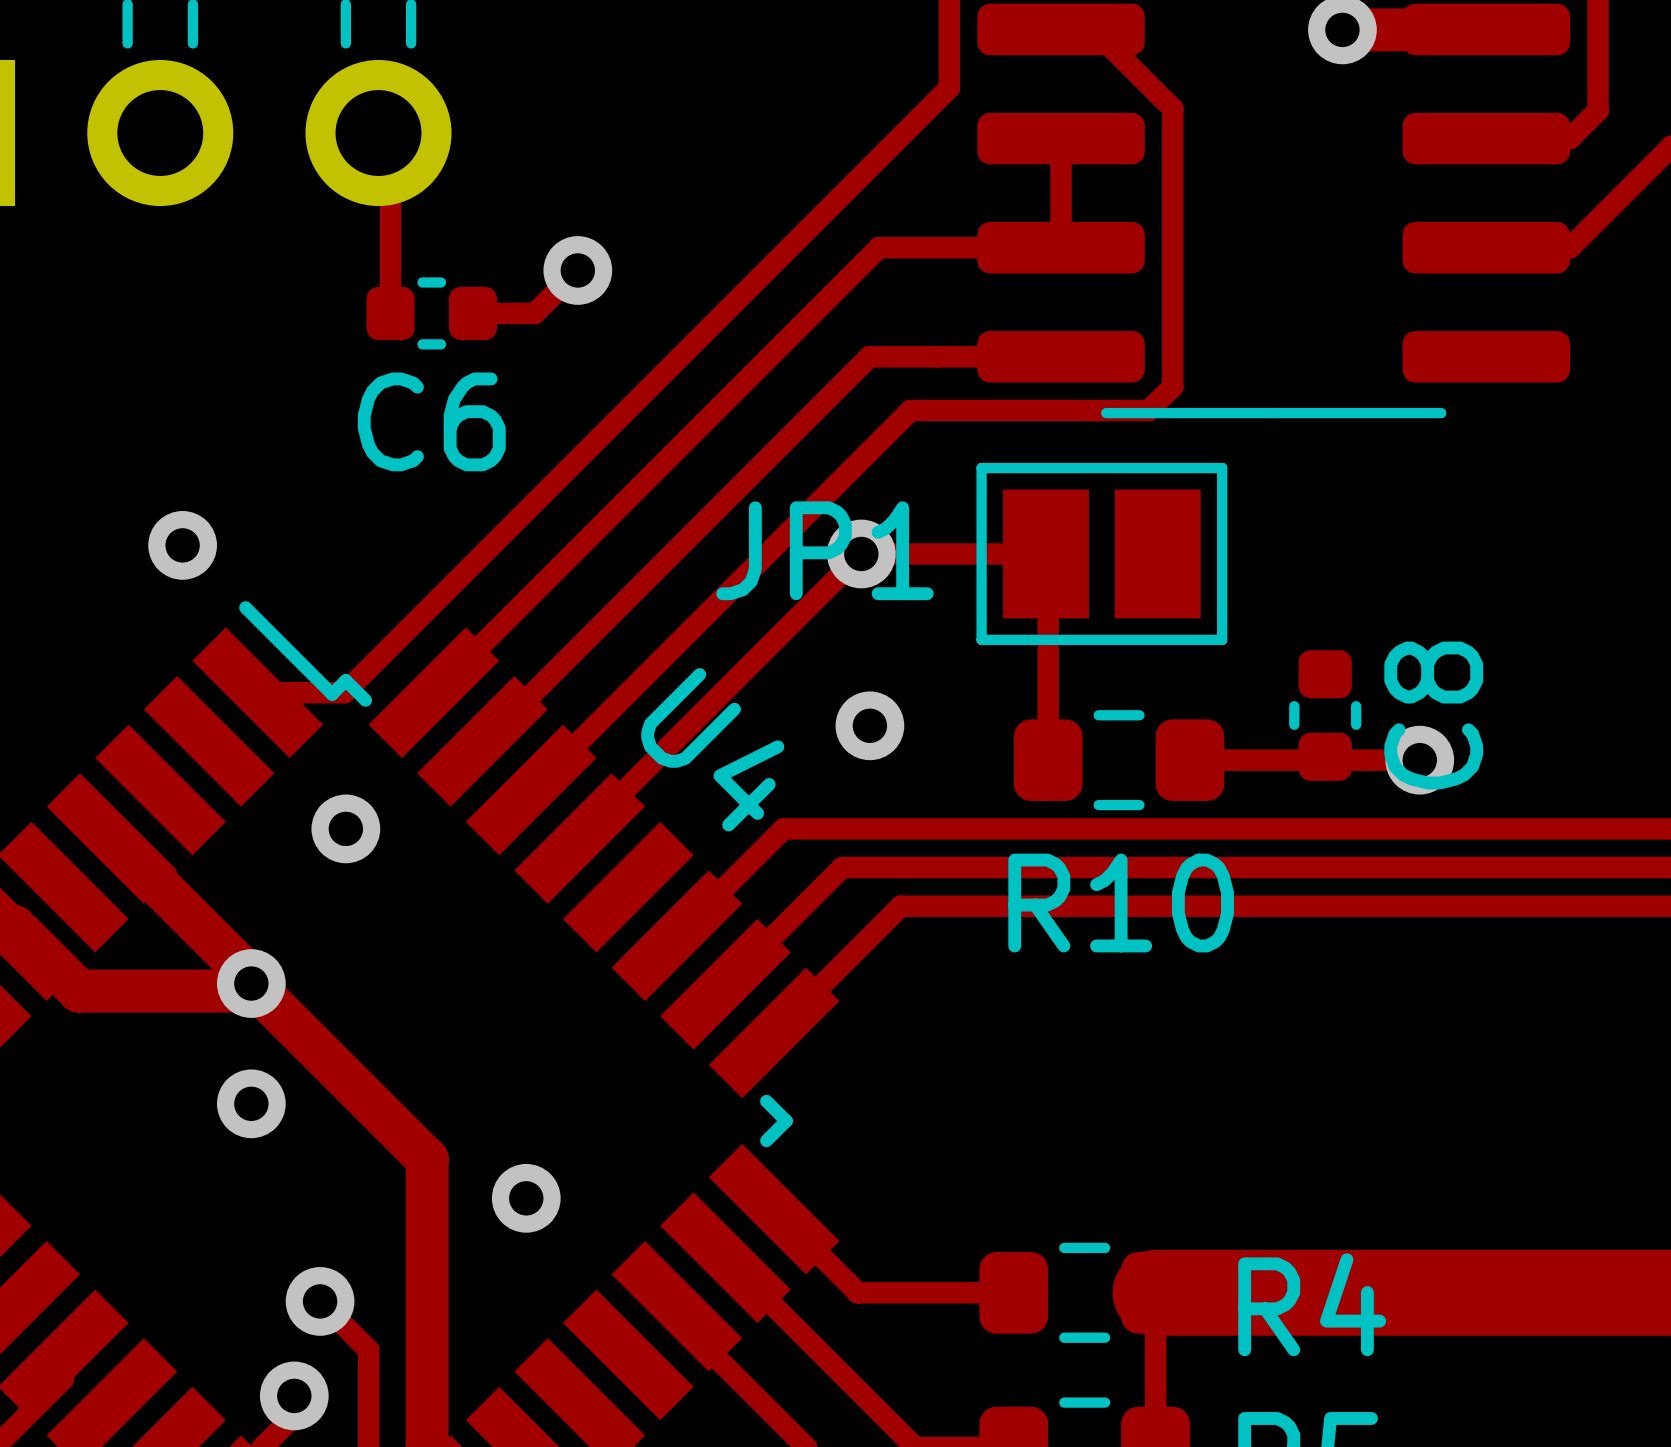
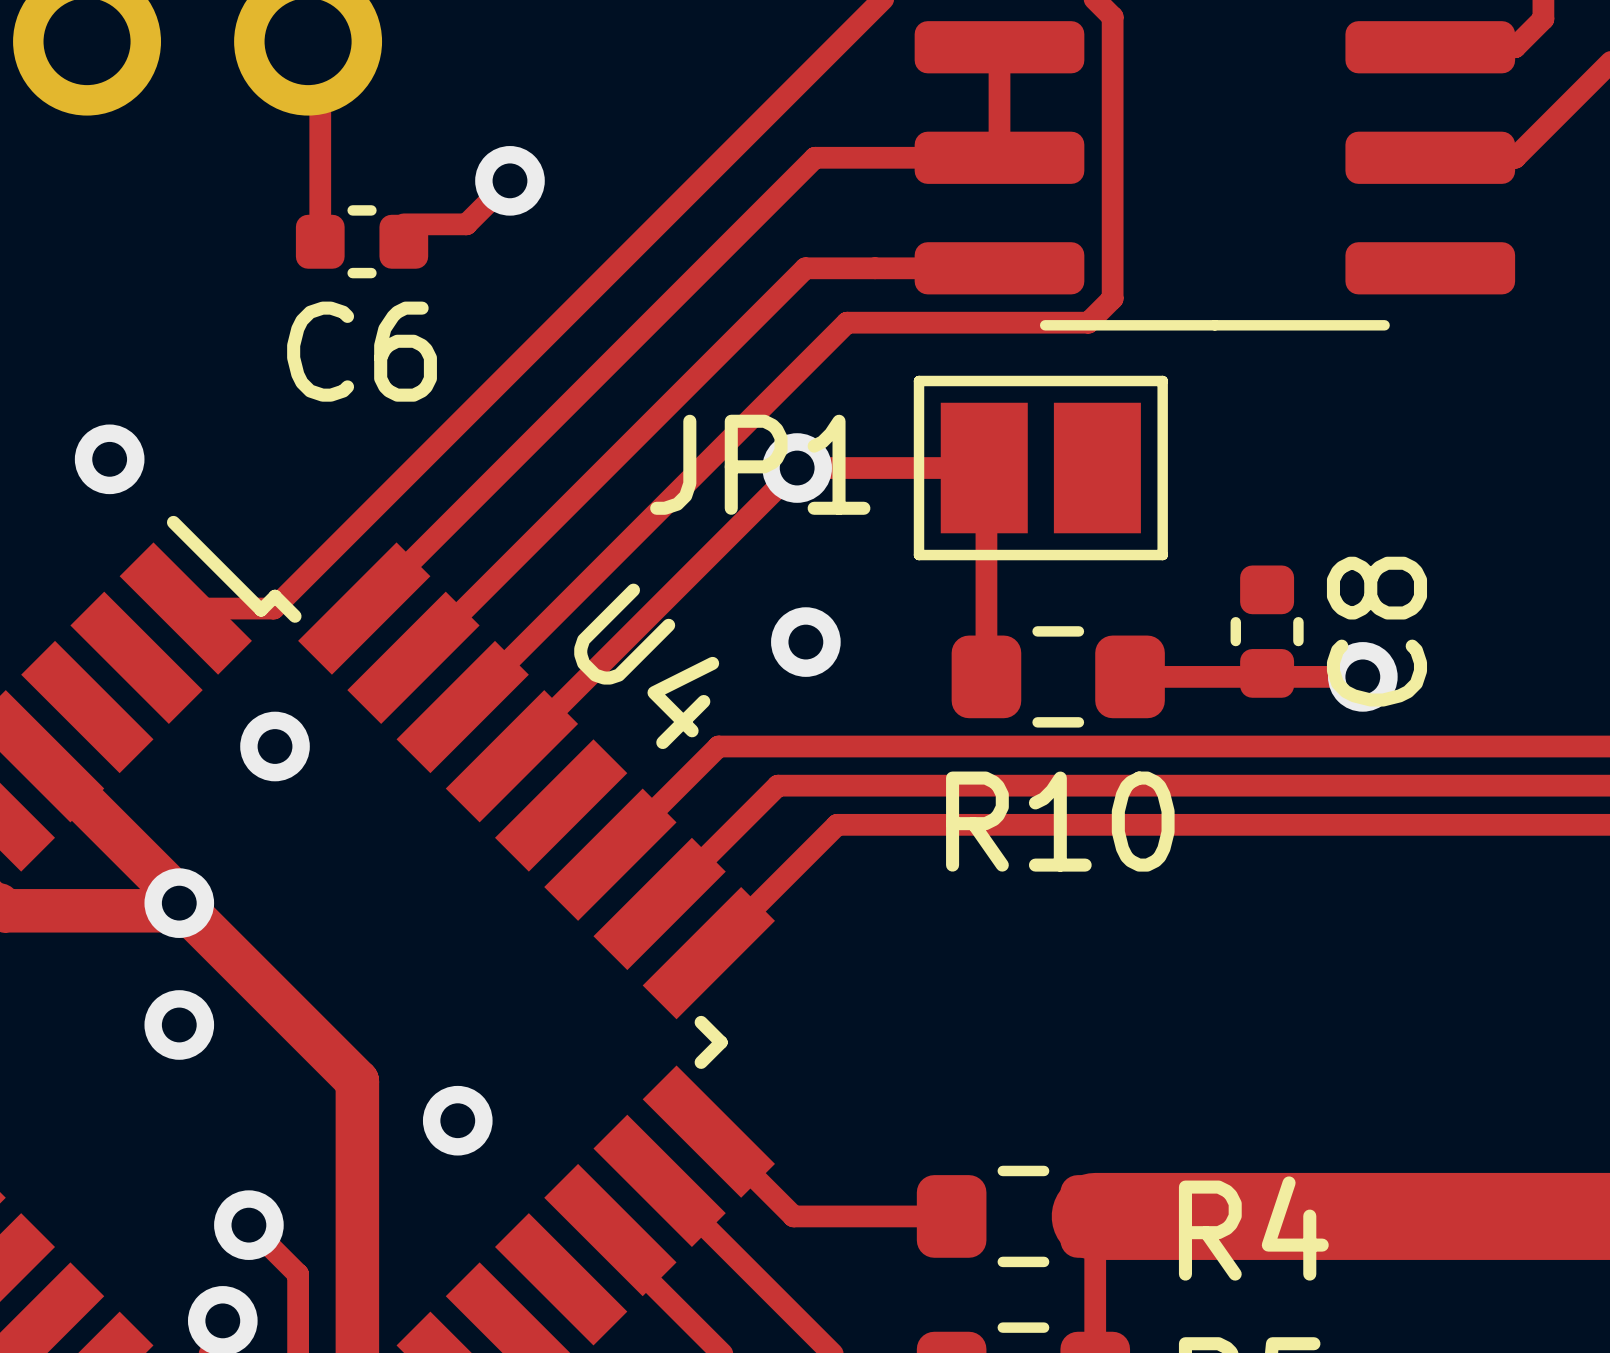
C6 position: (431, 313) -> (362, 241)

